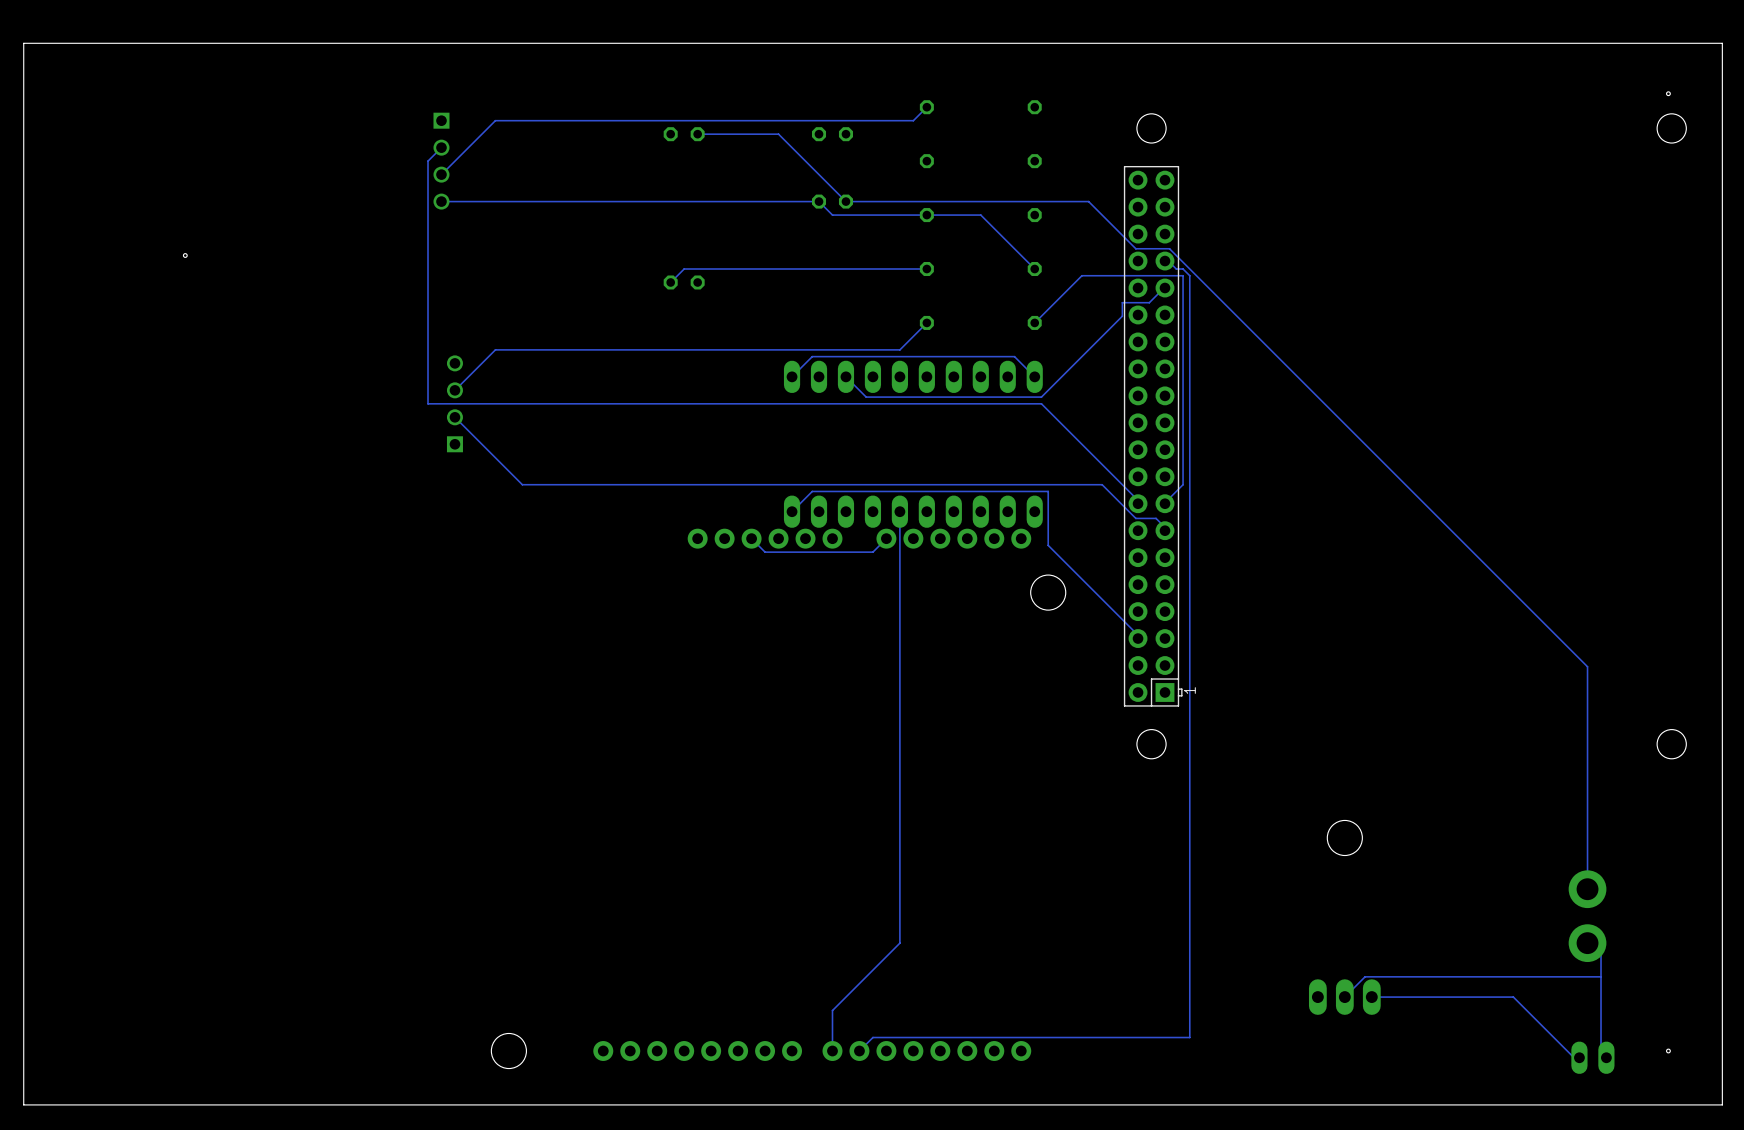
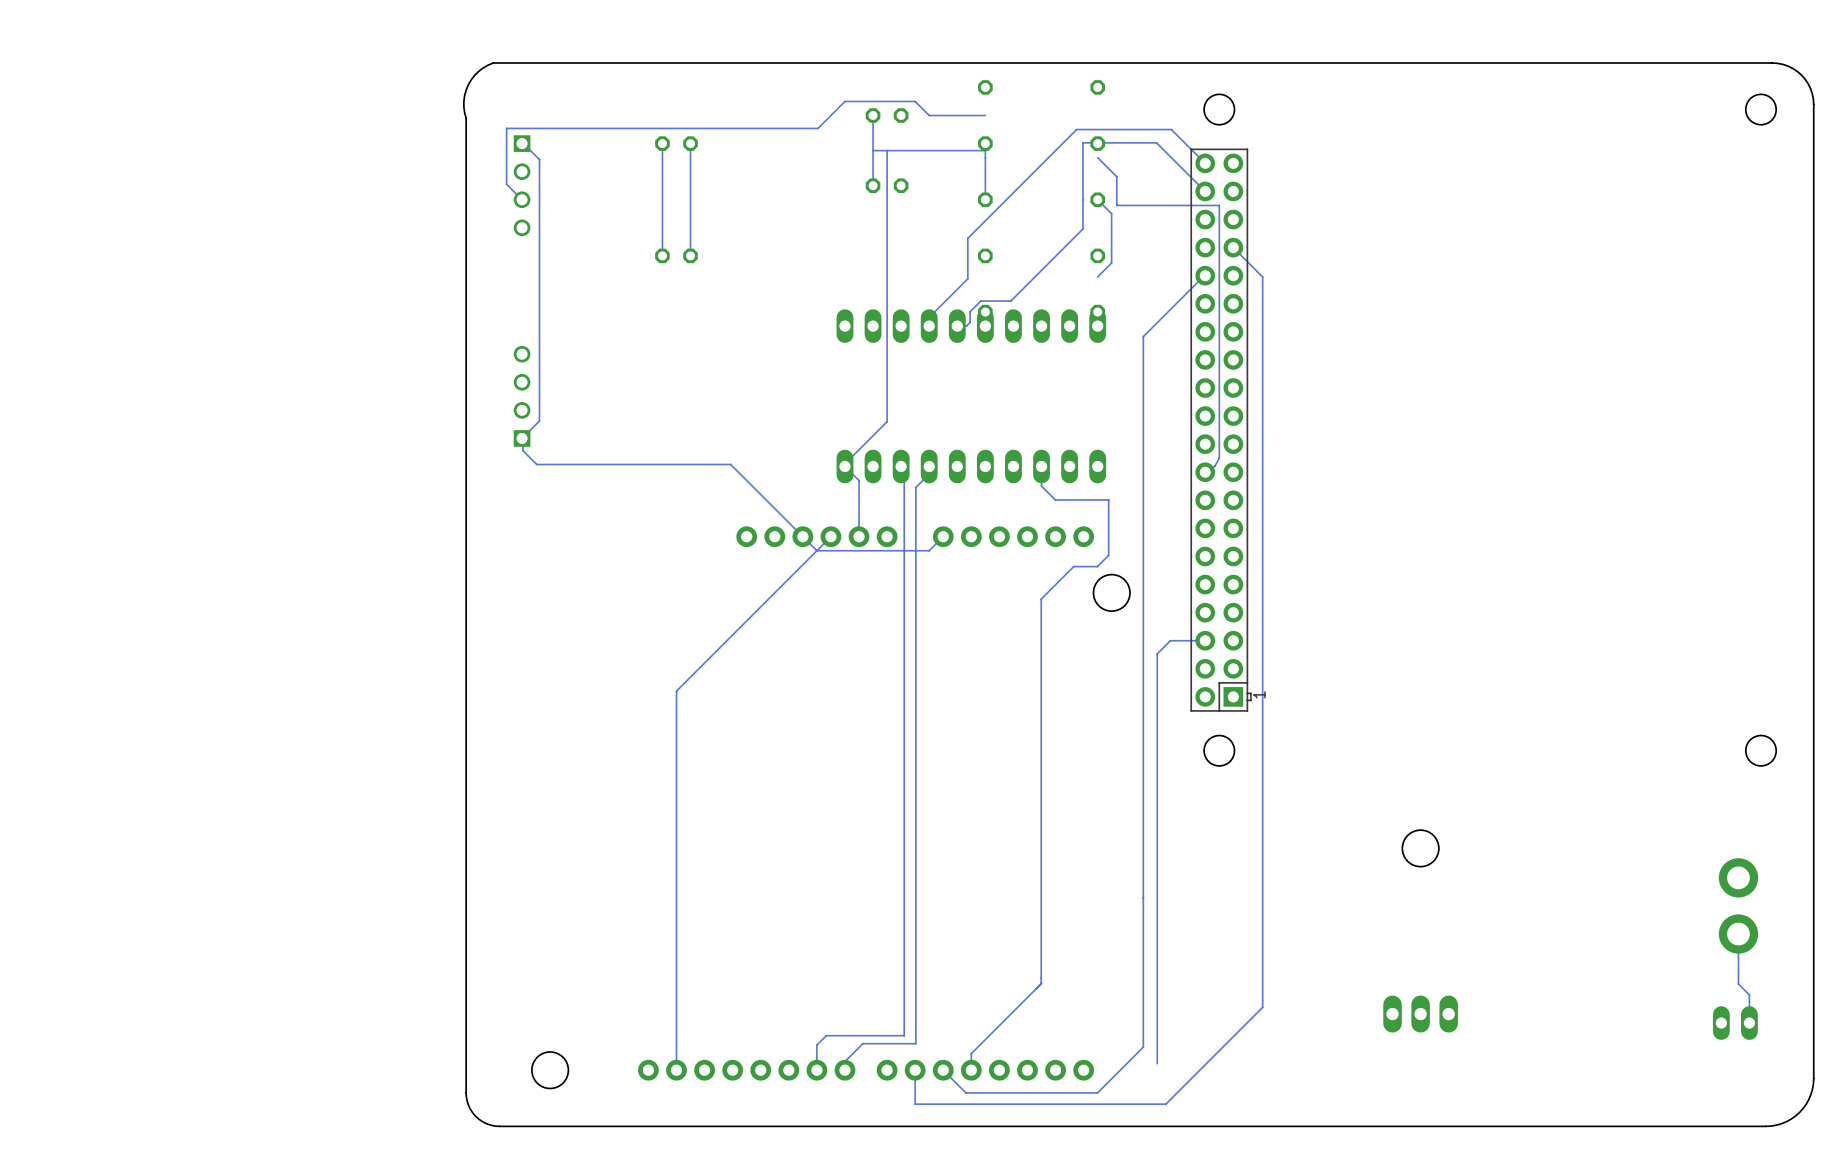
hole: (1668, 93) -> none
track: (926, 107) (913, 120) (859, 120) -> (985, 115) (929, 115) (915, 101)
track: (792, 120) (495, 120) (441, 174) -> (844, 101) (818, 128) (506, 128) (506, 184) (522, 199)
board edge: (1722, 123) (1722, 43) (23, 43) (23, 1104) (460, 1104) -> (1813, 104) (1810, 88) (1801, 75) (1788, 66) (1772, 63) (493, 63) (478, 71) (468, 84) (463, 101) (466, 118) (466, 1092) (468, 1105) (475, 1116) (486, 1123) (499, 1126)
part position: (684, 134) -> (676, 143)
track: (697, 134) (778, 134) (845, 201) (1088, 201) (1135, 248) (1169, 248) (1587, 666) (1587, 889) -> none
track: none -> (873, 115) (873, 185)
track: (441, 147) (428, 161) (428, 403) (1041, 403) (1135, 498) (1138, 503) -> none
part position: (441, 161) -> (522, 185)
track: none -> (522, 143) (539, 159) (539, 421) (522, 438)
track: none -> (662, 143) (662, 255)
track: none -> (690, 143) (690, 255)
track: none -> (873, 150) (985, 150) (985, 199)
track: none -> (887, 150) (887, 421) (844, 463) (844, 466) (859, 480) (859, 536)
track: none -> (1097, 157) (1116, 176) (1116, 205) (1219, 205) (1219, 458) (1214, 466) (1205, 472)
track: none -> (1205, 163) (1171, 129) (1076, 129) (967, 238) (967, 278) (929, 317) (929, 326)
track: (441, 201) (819, 201) (832, 215) (980, 215) (1034, 269) -> none
track: none -> (1205, 191) (1156, 142) (1082, 142) (1082, 228) (1010, 301) (980, 301) (970, 311) (970, 322) (966, 326) (957, 326) (958, 326)
track: none -> (1097, 199) (1111, 213) (1111, 263) (1097, 277)
hole: (185, 255) -> none
track: (1164, 261) (1169, 262) (1176, 269) (1183, 269) (1189, 275) (1189, 1037) (872, 1037) (859, 1051) -> (1233, 247) (1262, 276) (1262, 1007) (1165, 1104) (915, 1104) (915, 1070)
track: (926, 269) (684, 269) (670, 282) -> none
part position: (684, 282) -> (676, 255)
track: none -> (1205, 275) (1143, 336) (1143, 898)
track: (1164, 288) (1149, 302) (1122, 302) (1122, 316) (1041, 397) (866, 397) (845, 376) -> none
track: (926, 322) (899, 349) (495, 349) (454, 390) -> none
track: (1034, 322) (1081, 275) (1183, 275) (1183, 484) (1164, 503) -> none
part position: (913, 376) -> (971, 326)
track: (1034, 376) (1014, 356) (812, 356) (792, 376) -> none
part position: (454, 403) -> (522, 396)
track: (454, 417) (522, 484) (1102, 484) (1135, 518) (1156, 518) (1164, 530) -> none
track: none -> (522, 437) (522, 450) (536, 464) (730, 464) (802, 536)
track: none -> (901, 466) (904, 470) (904, 1035) (826, 1035) (816, 1045) (816, 1070)
track: none -> (929, 466) (929, 474) (915, 487) (915, 1043) (862, 1043) (844, 1061) (844, 1070)
track: none -> (1041, 466) (1041, 486) (1055, 499) (1108, 499) (1108, 555) (1097, 566) (1073, 566) (1041, 599) (1041, 983) (1035, 989)
track: (792, 511) (812, 491) (1048, 491) (1048, 545) (1135, 633) (1138, 638) -> (1157, 1063) (1157, 653) (1170, 640) (1205, 640)
track: (899, 511) (899, 943) (832, 1010) (832, 1051) -> none
part position: (913, 511) -> (971, 466)
track: none -> (830, 536) (676, 691) (676, 1070)
track: none -> (1143, 897) (1143, 1047) (1097, 1092) (965, 1092) (943, 1070)
part position: (1587, 916) -> (1738, 905)
track: none -> (1738, 934) (1738, 984) (1749, 994) (1749, 1023)
track: (1587, 943) (1601, 943) (1601, 1057) (1606, 1057) -> none
track: none -> (1041, 983) (971, 1053) (971, 1070)
track: (1601, 976) (1365, 976) (1344, 997) -> none
track: (1371, 997) (1513, 997) (1574, 1057) (1579, 1057) -> none
hole: (1668, 1051) -> none
part position: (1592, 1057) -> (1735, 1023)
board edge: (1722, 1058) (1722, 1104) (1676, 1104) -> (1813, 1078) (1811, 1094) (1799, 1112) (1781, 1123) (1765, 1126)

